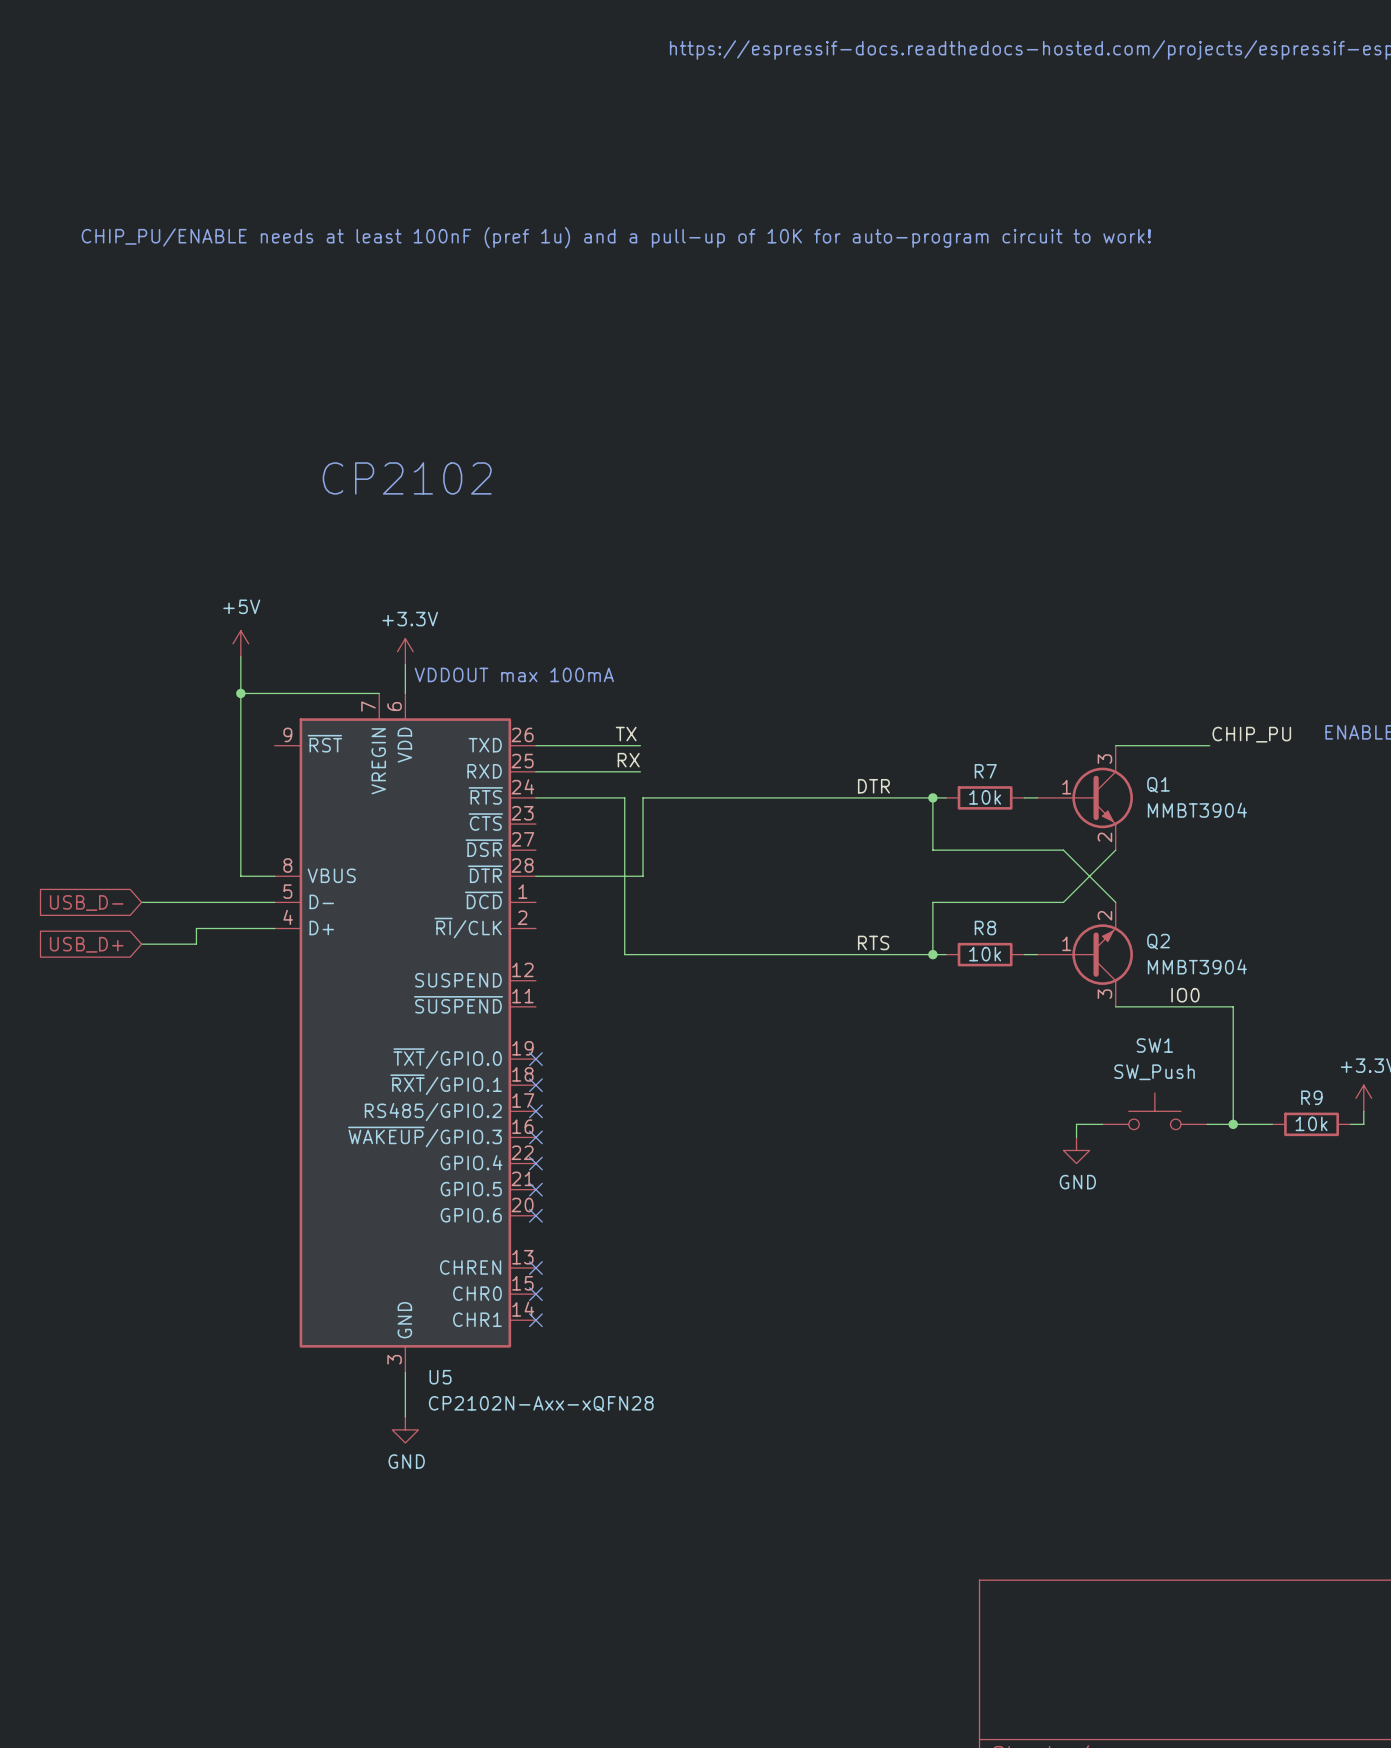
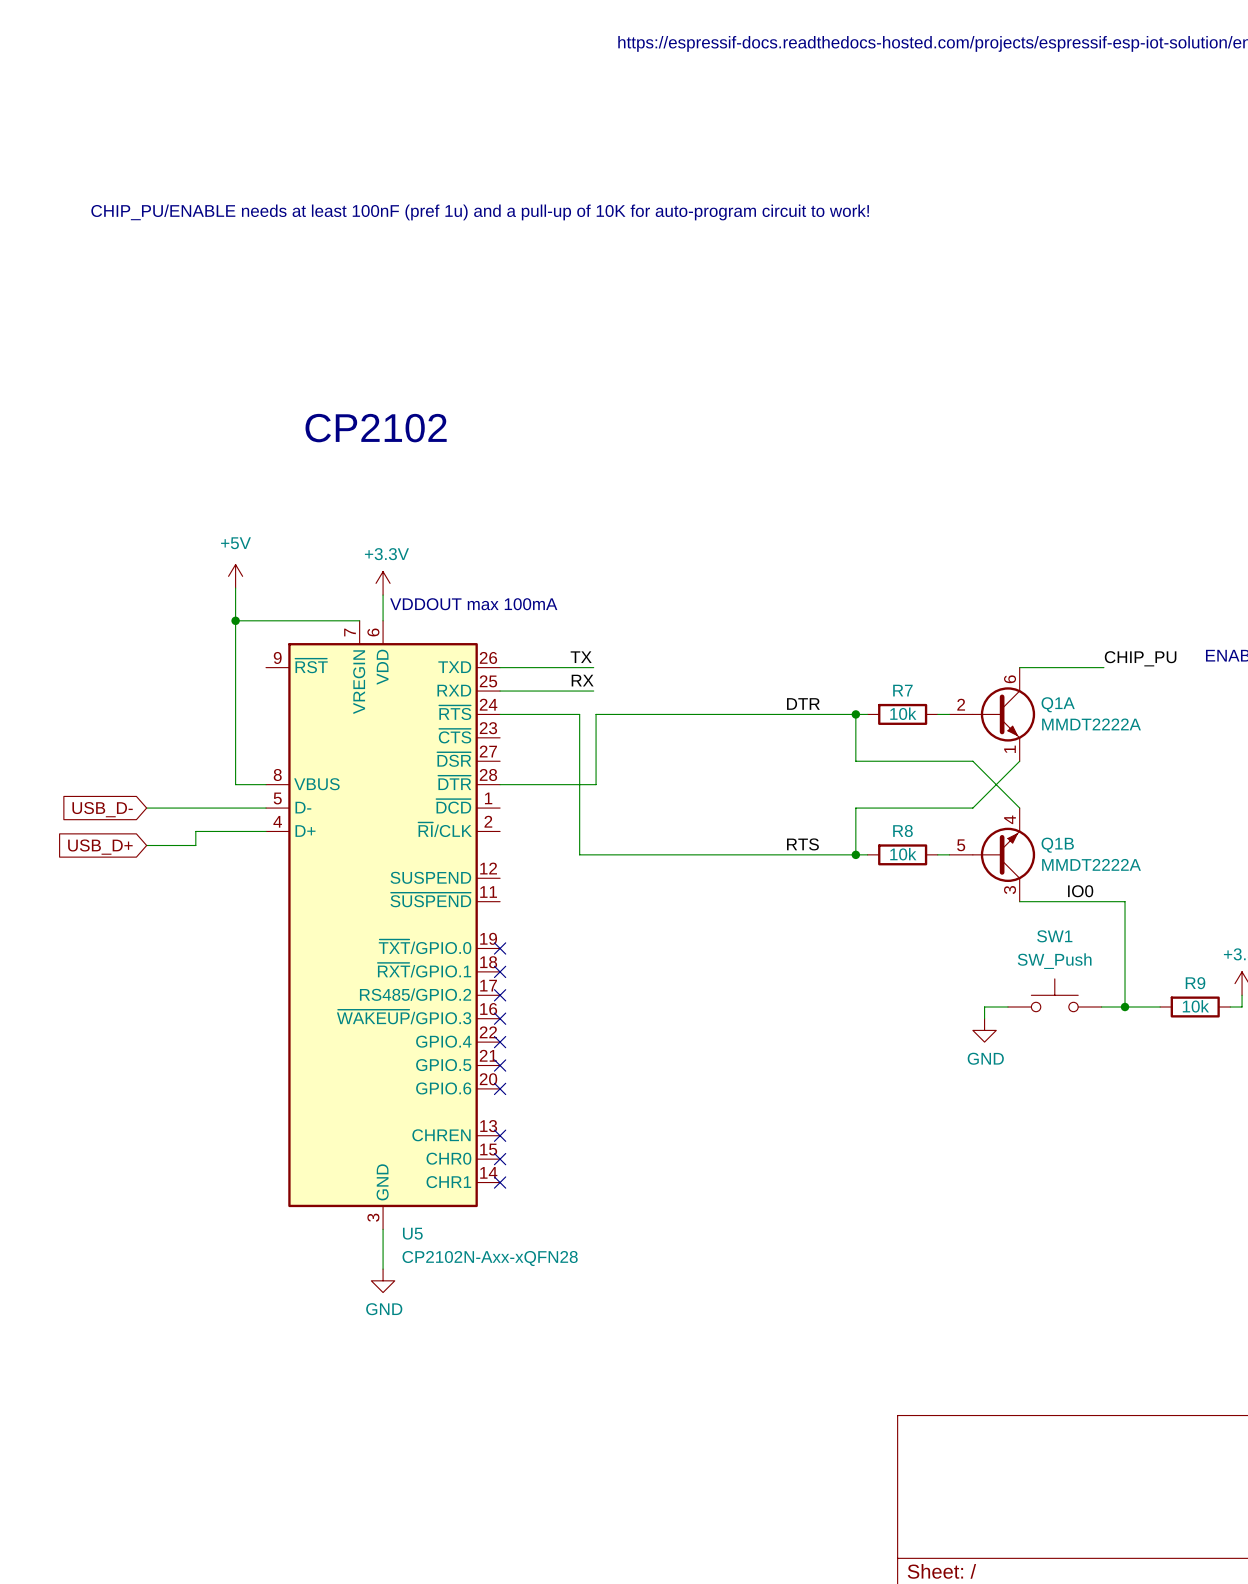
Q1: MMBT3904 (1085, 797) -> none
Q1A: none -> MMDT2222A (992, 714)
Q2: MMBT3904 (1085, 954) -> none
Q1B: none -> MMDT2222A (992, 854)

